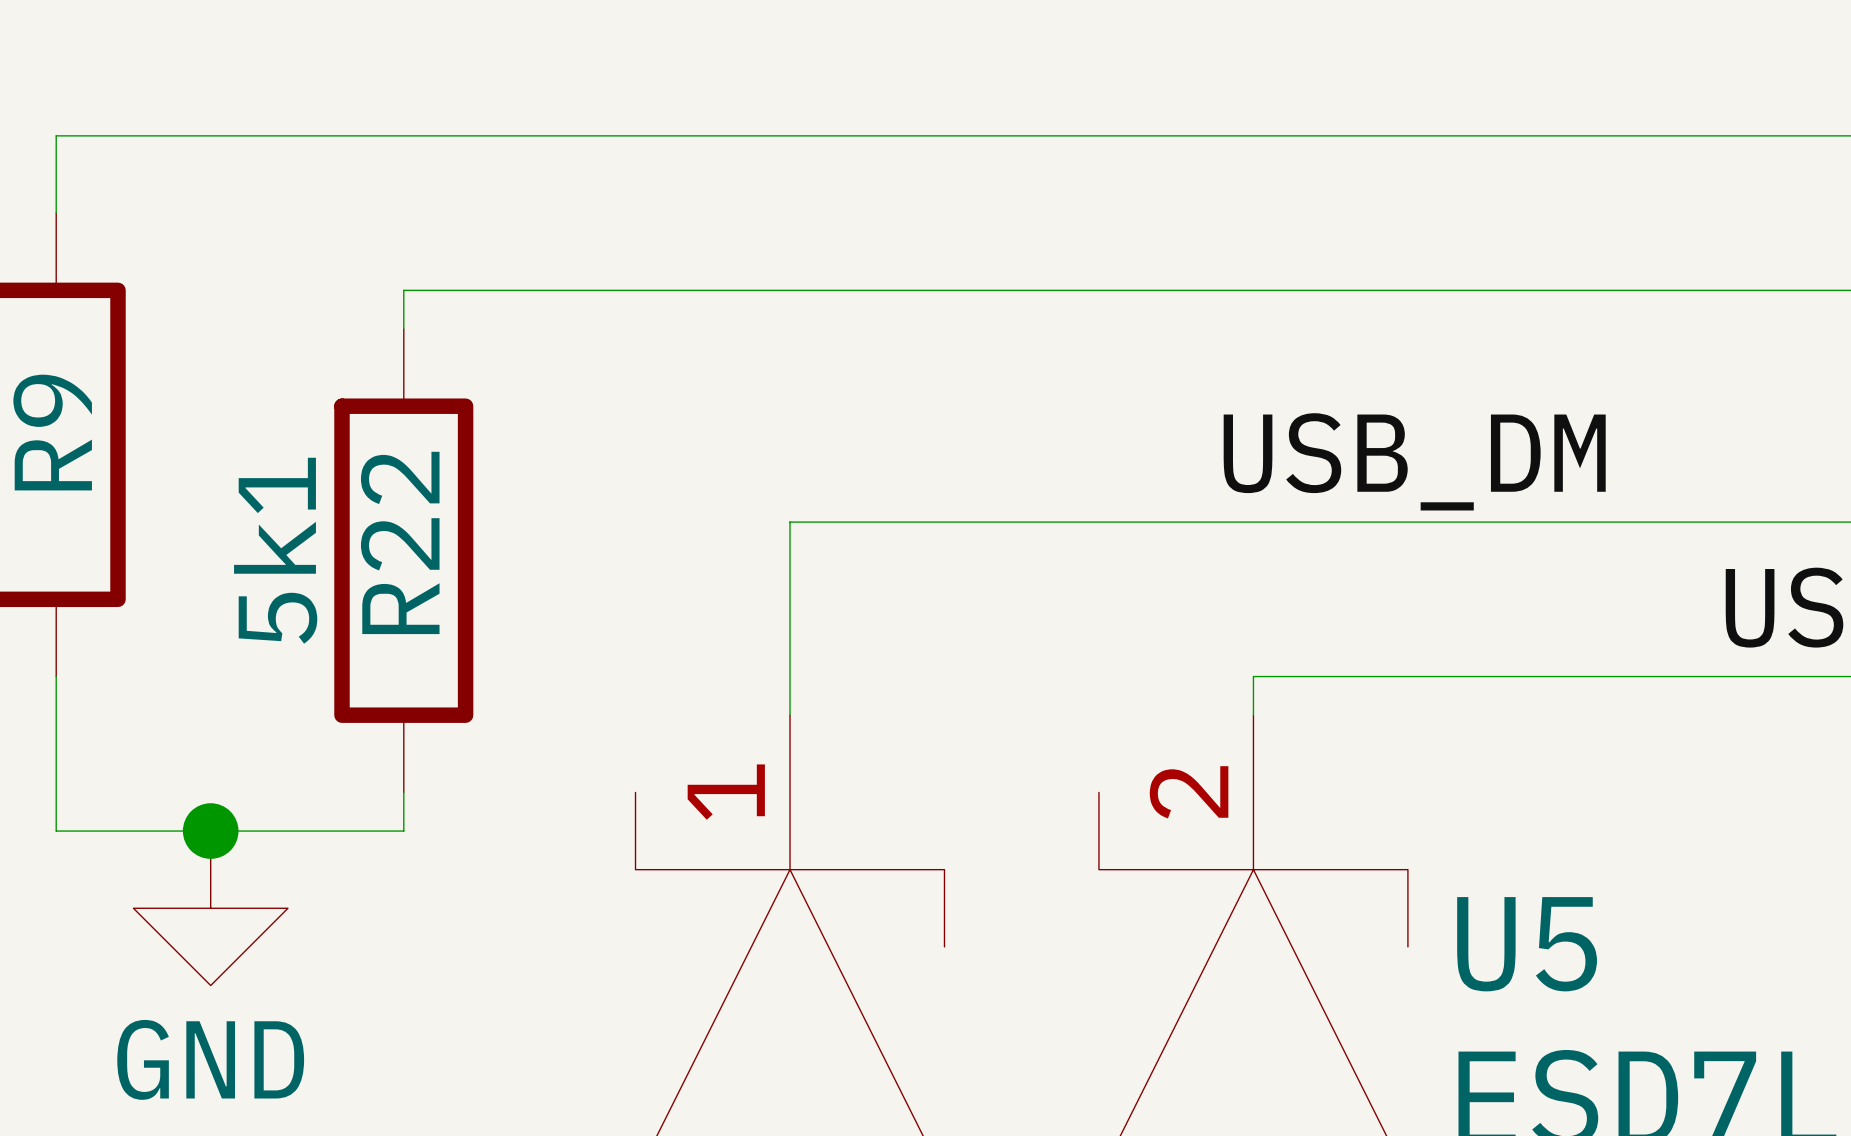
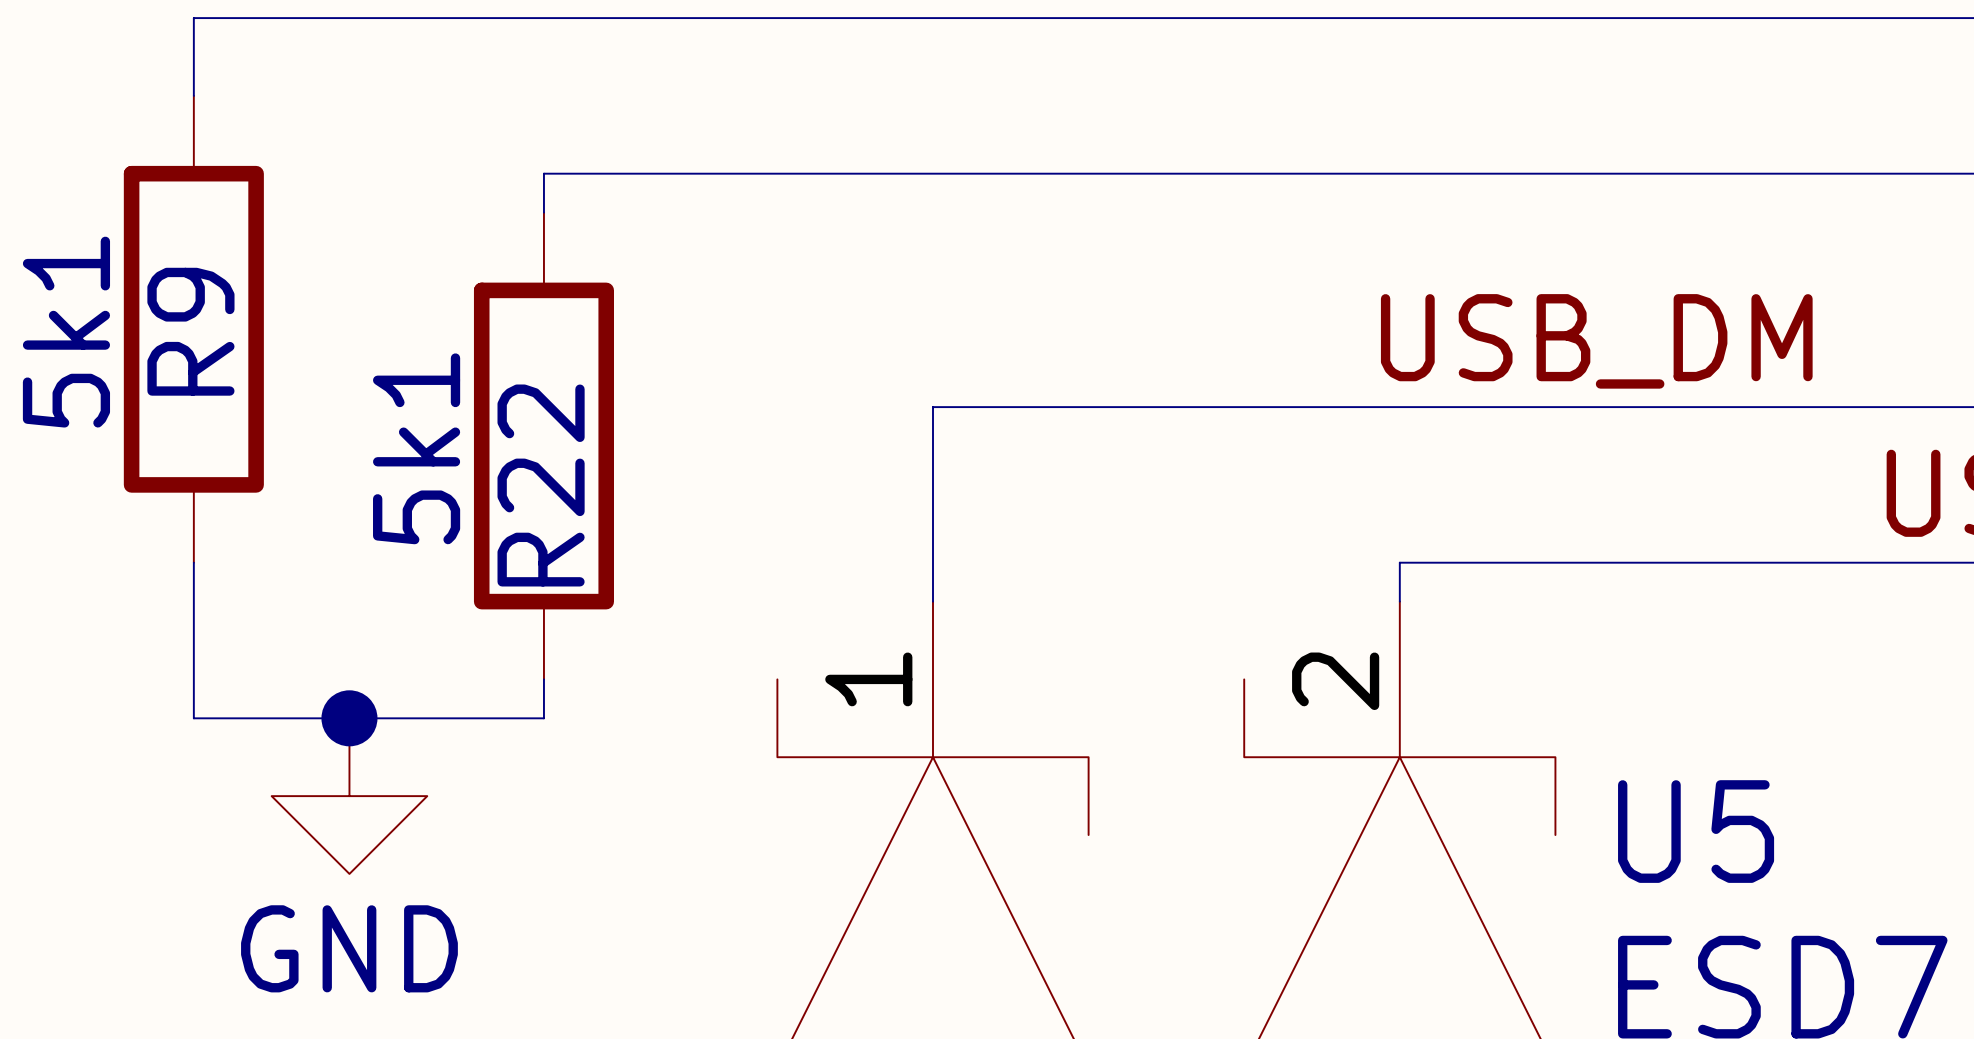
R22 name position: R22 (400, 542) -> R22 (541, 485)

